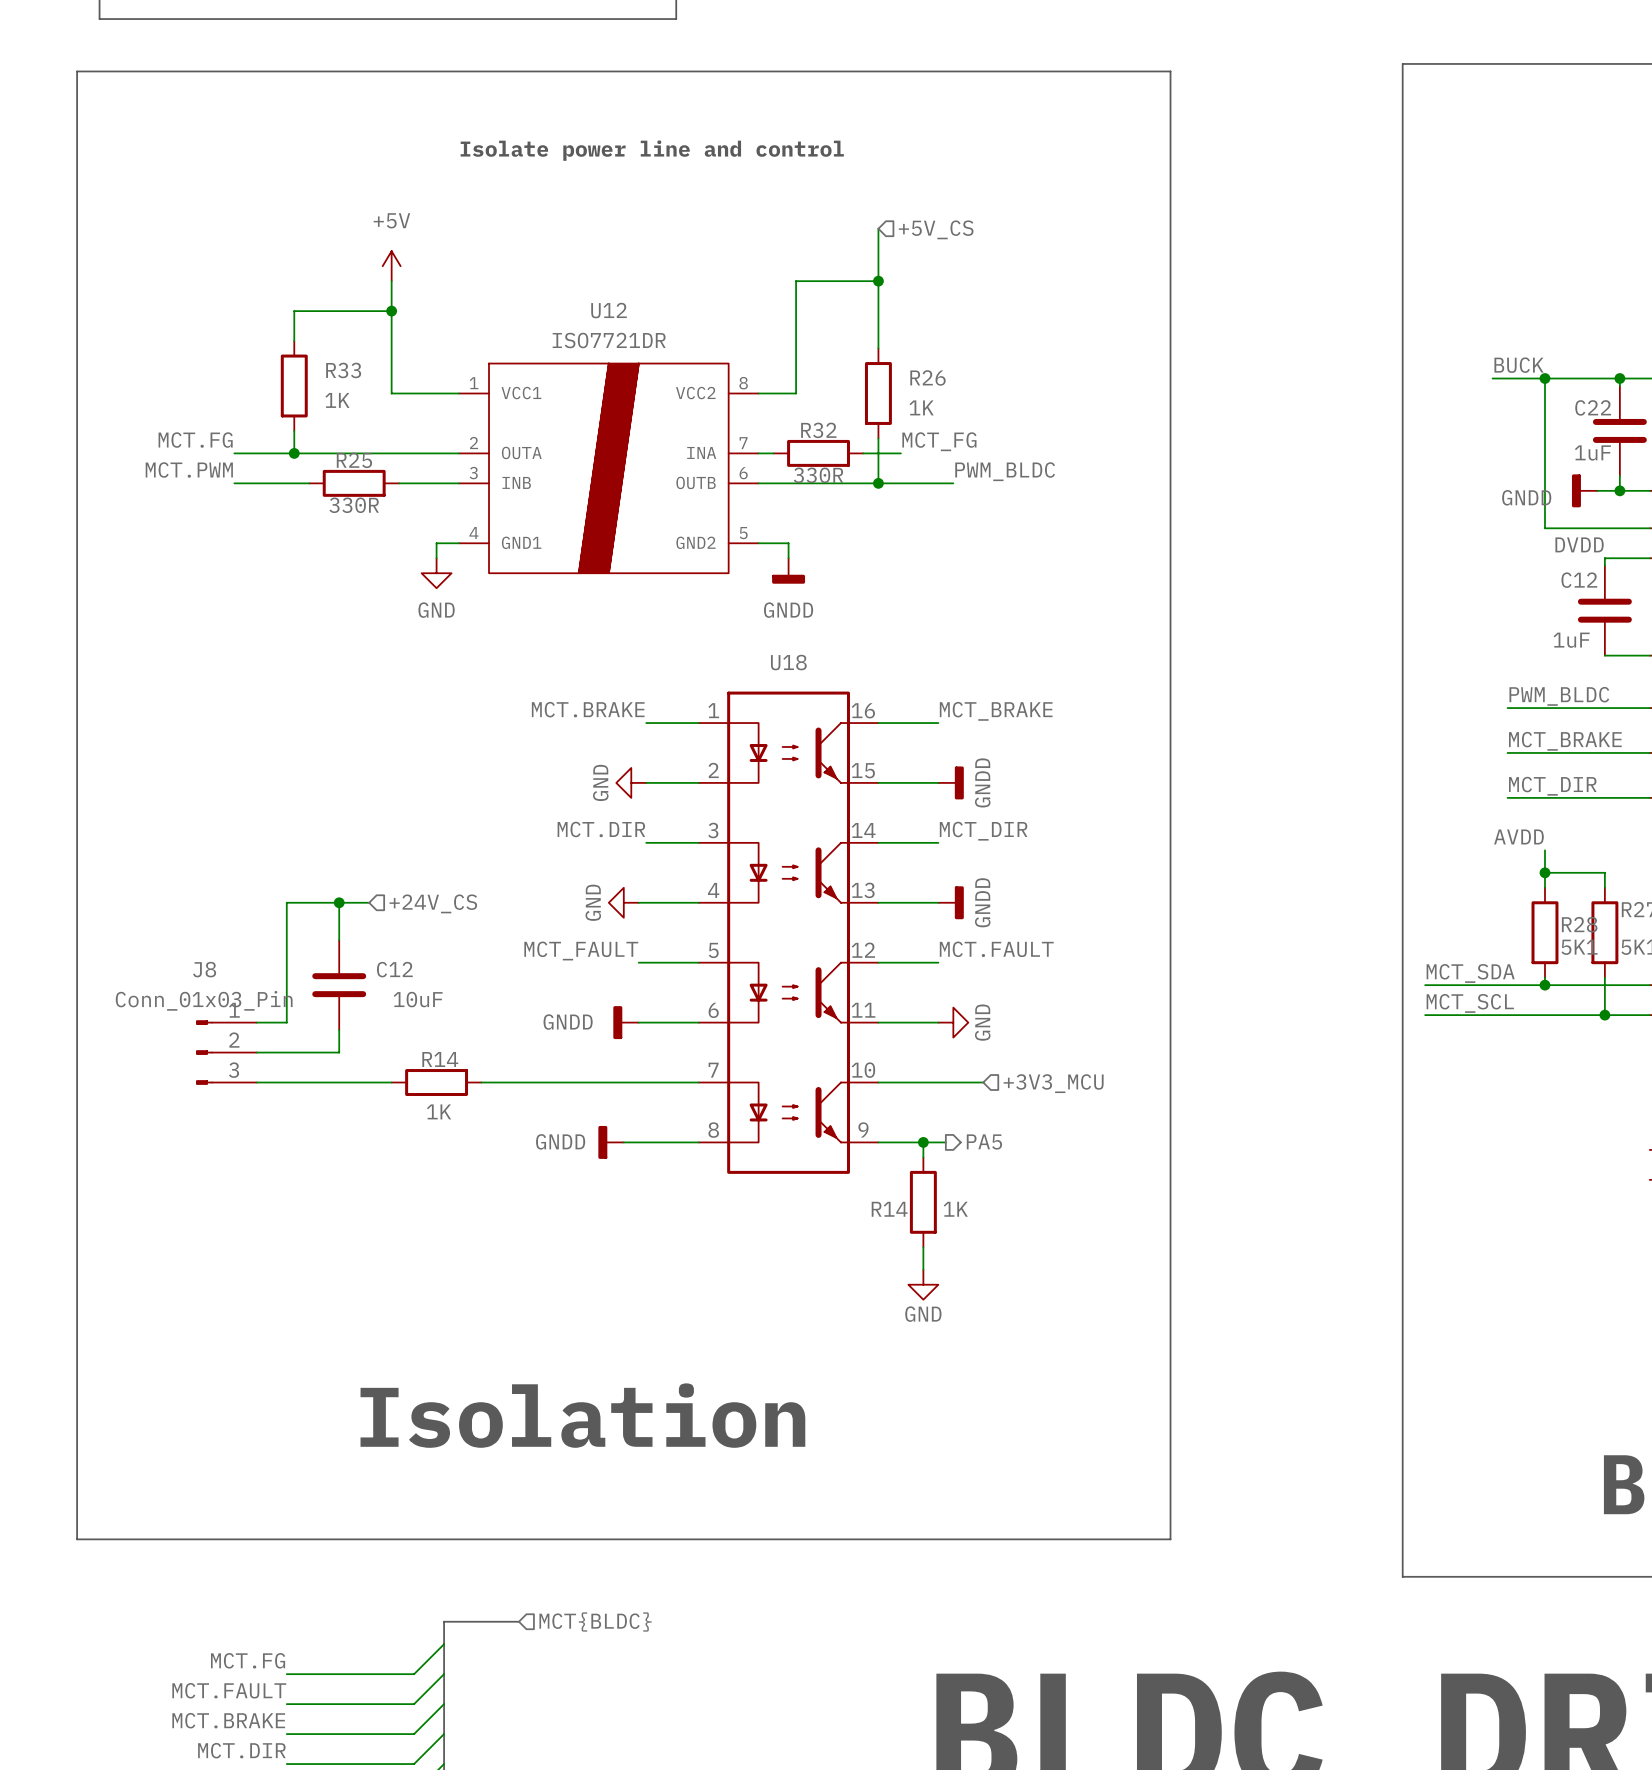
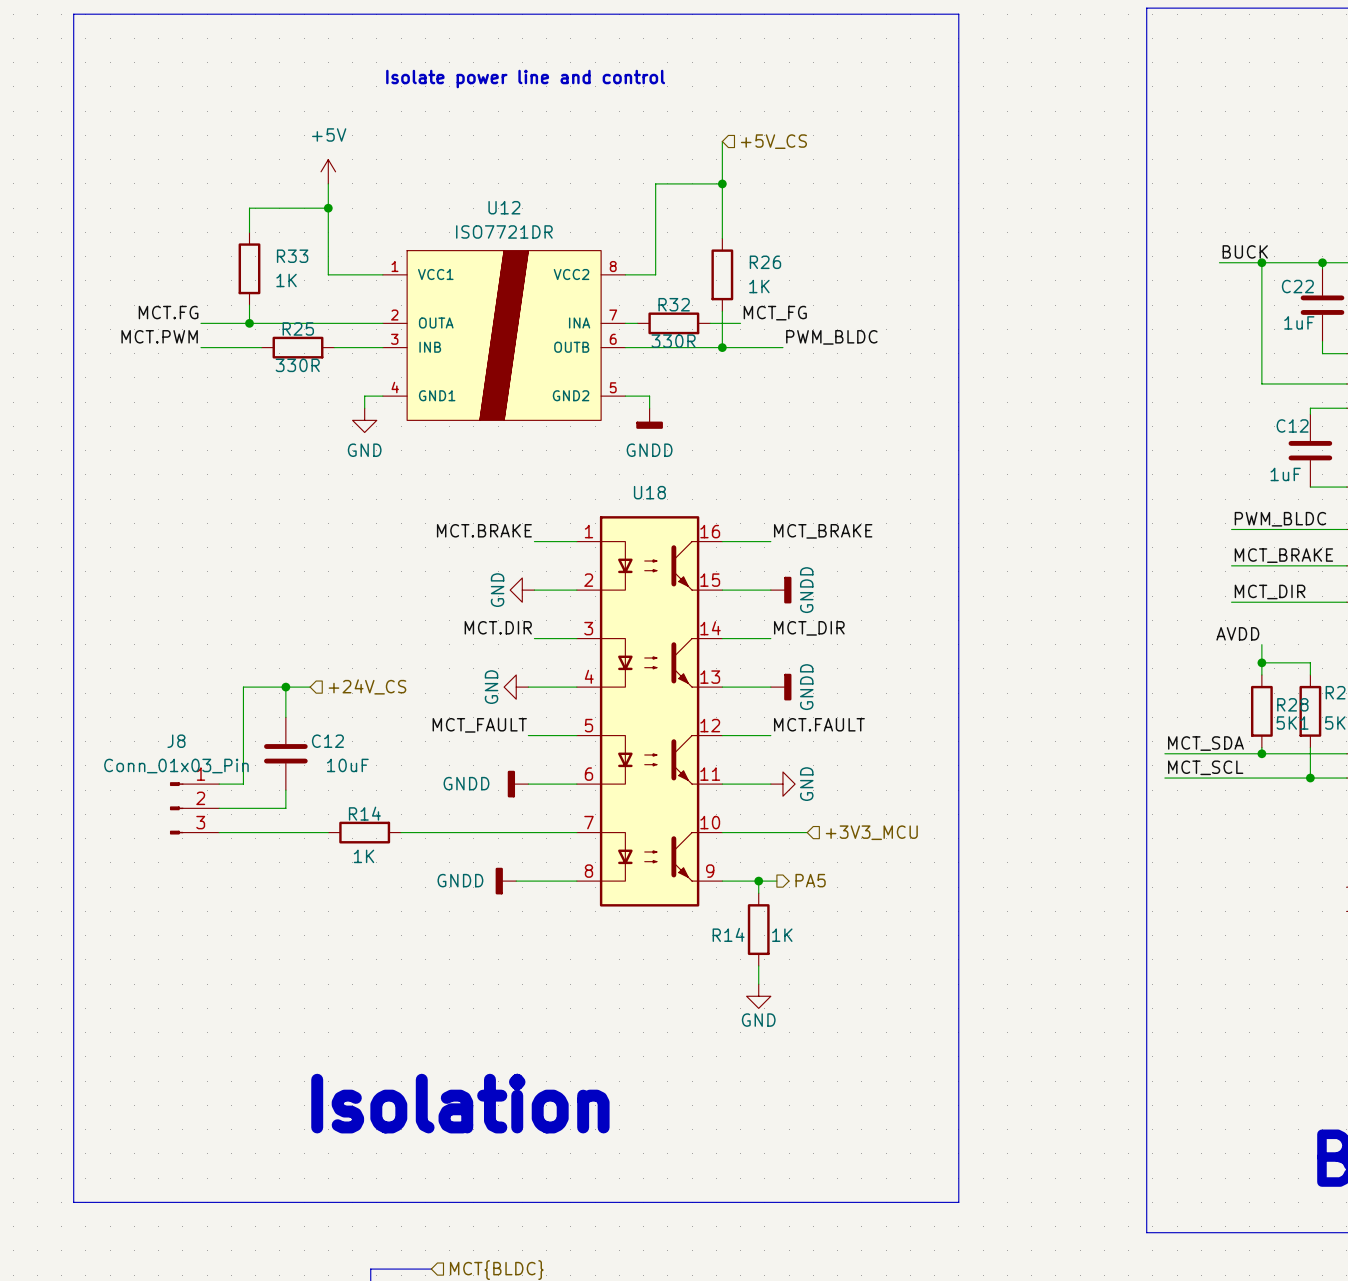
power symbol: GNDD (1584, 490) -> none
wire: (1597, 490) (1619, 490) -> none
junction: (1619, 490) -> none
label: DVDD (1579, 544) -> none

